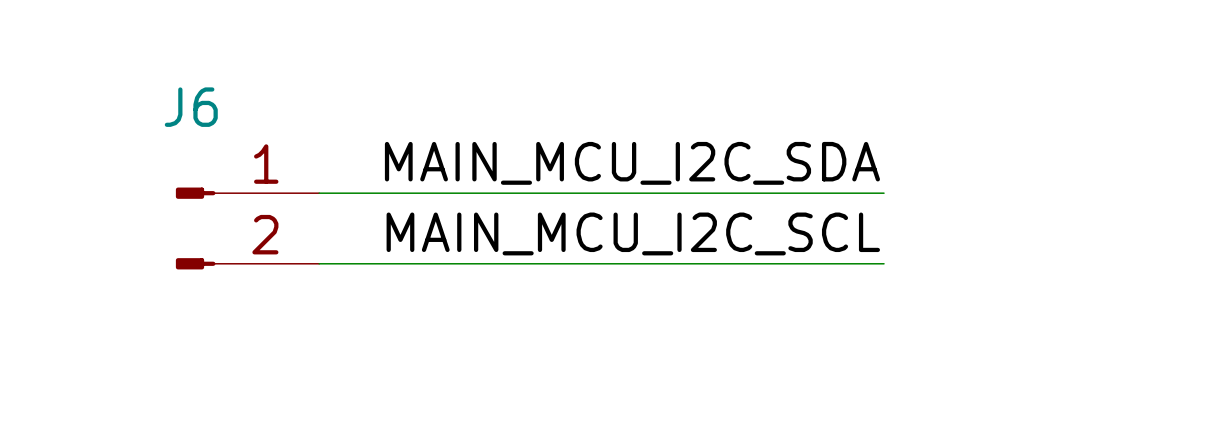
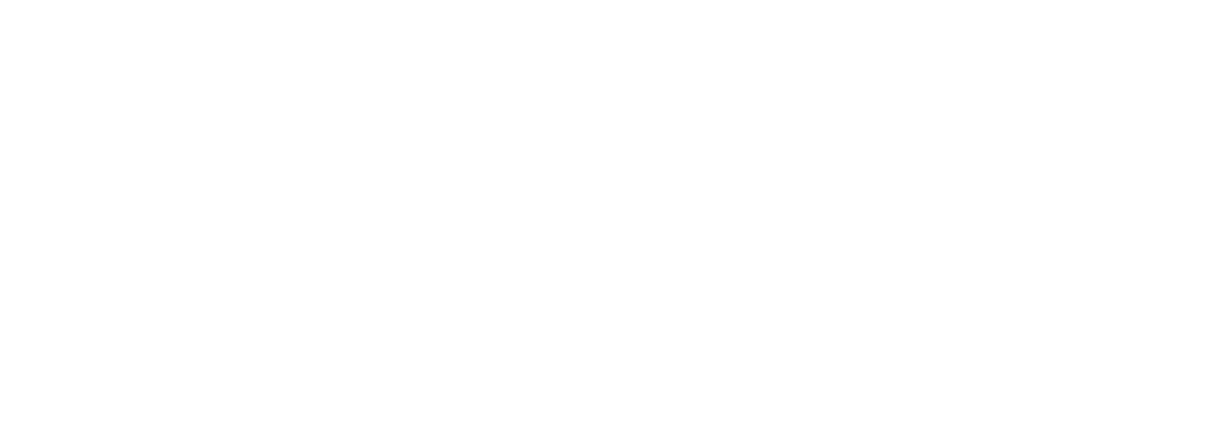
label: MAIN_MCU_I2C_SDA (632, 163) -> none
wire: (319, 193) (884, 193) -> none
J6: (247, 228) -> none
label: MAIN_MCU_I2C_SCL (633, 233) -> none
wire: (319, 263) (884, 263) -> none

